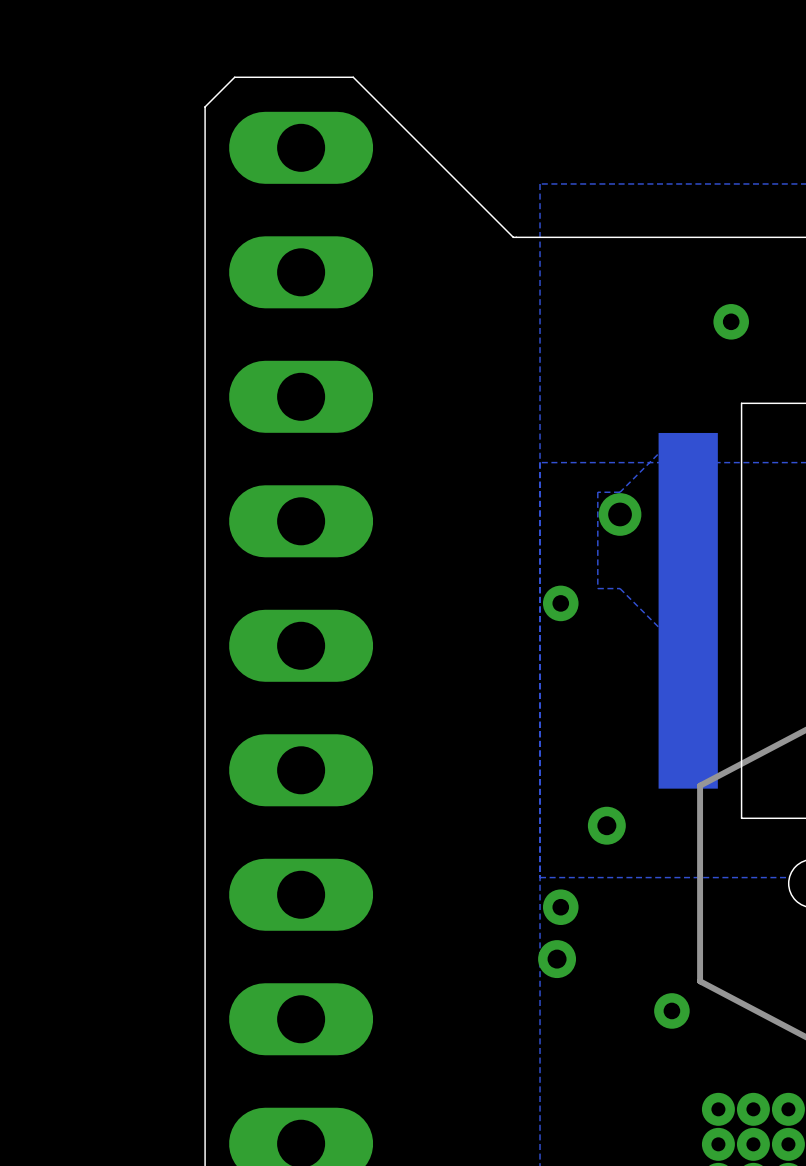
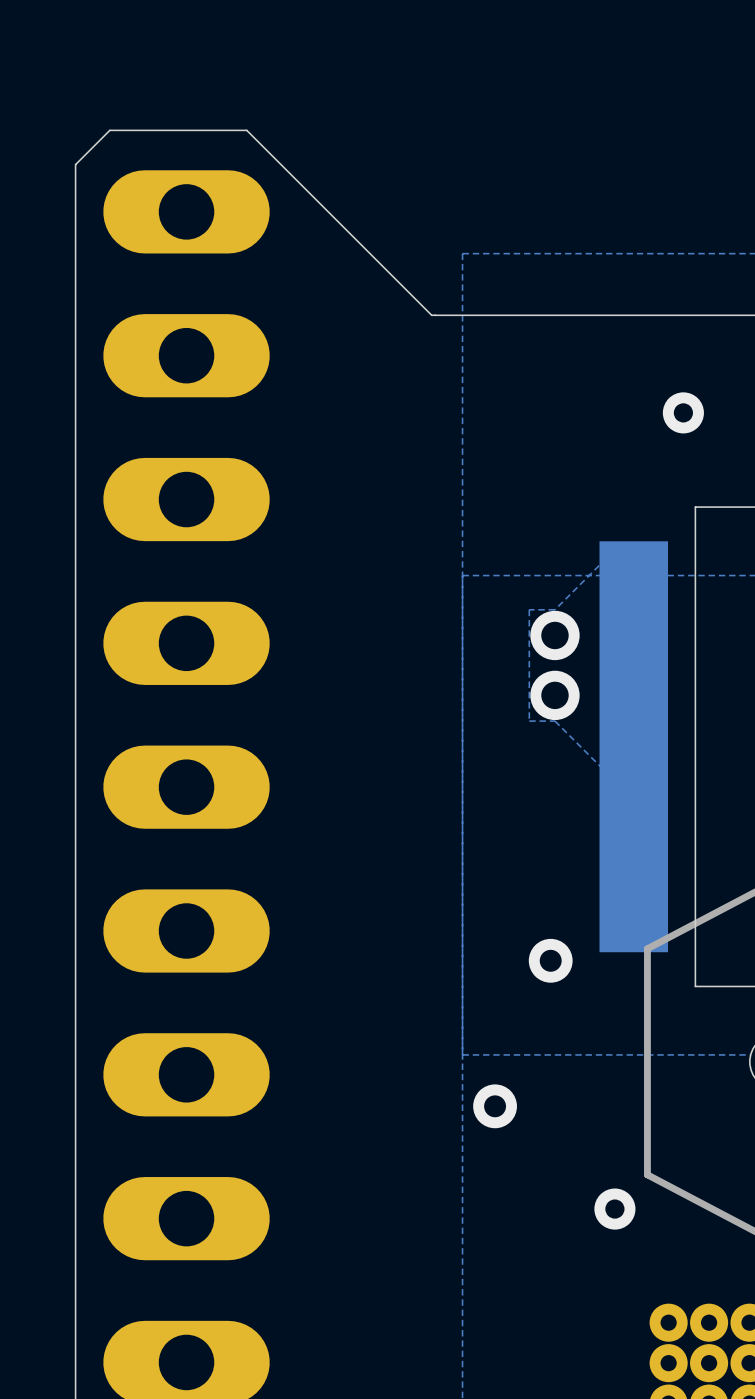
via: none -> (554, 695)
via: (560, 603) -> none
via position: (606, 825) -> (550, 960)
via: (560, 907) -> none
via position: (557, 959) -> (495, 1106)

